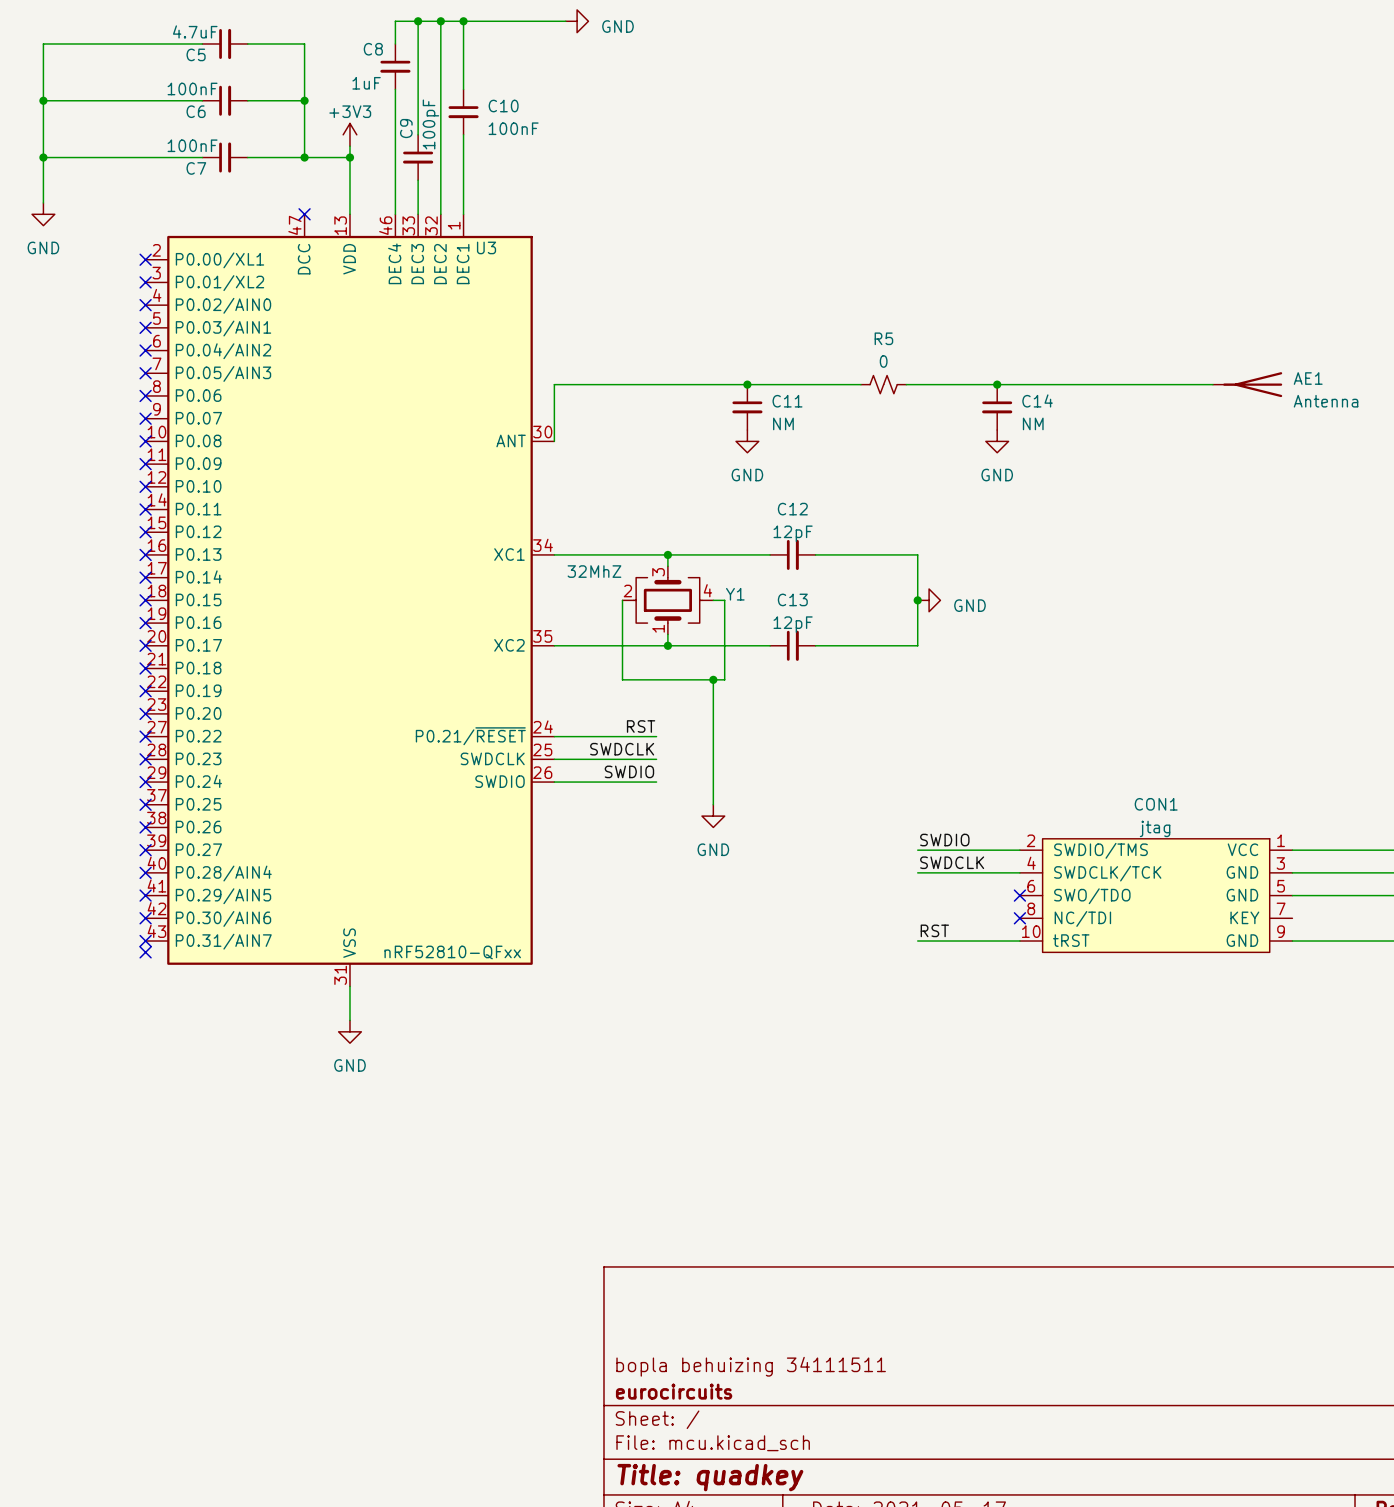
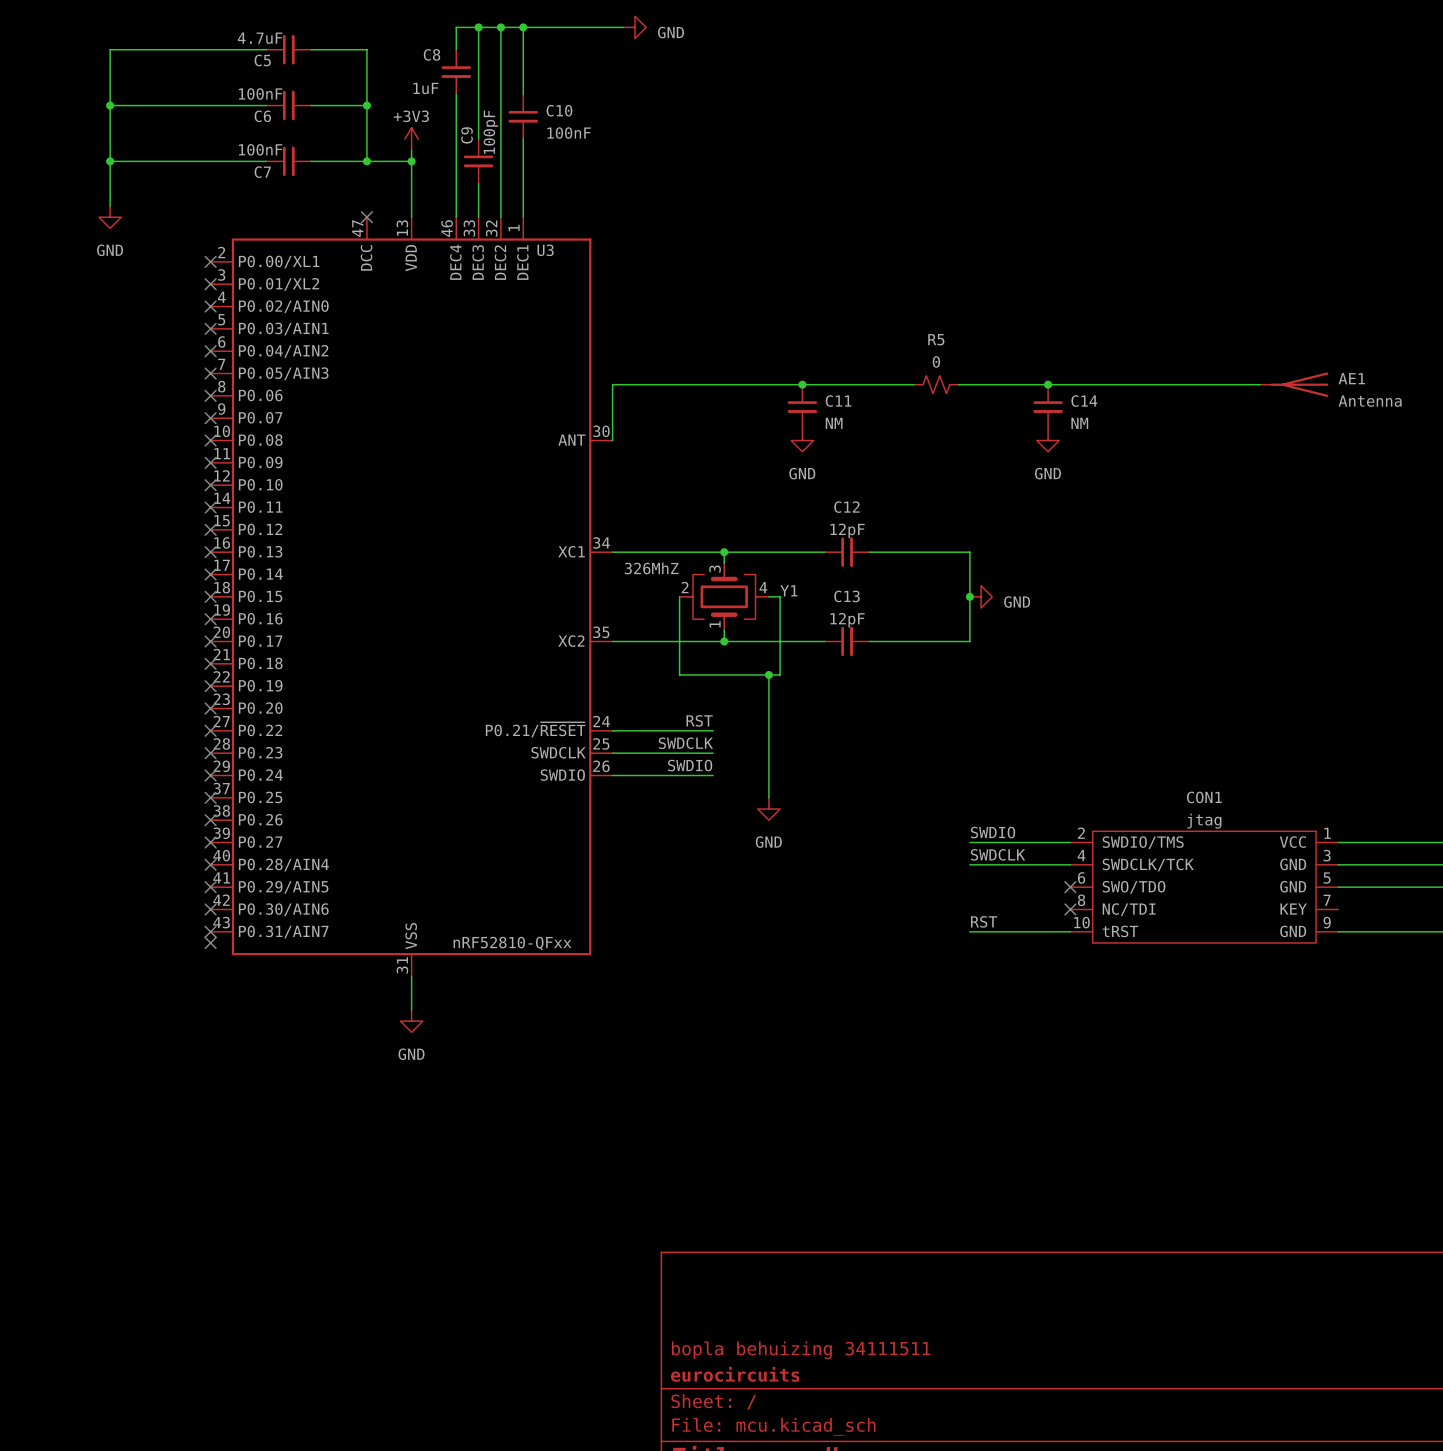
Y1 value: 32MhZ (594, 571) -> 326MhZ (651, 568)

